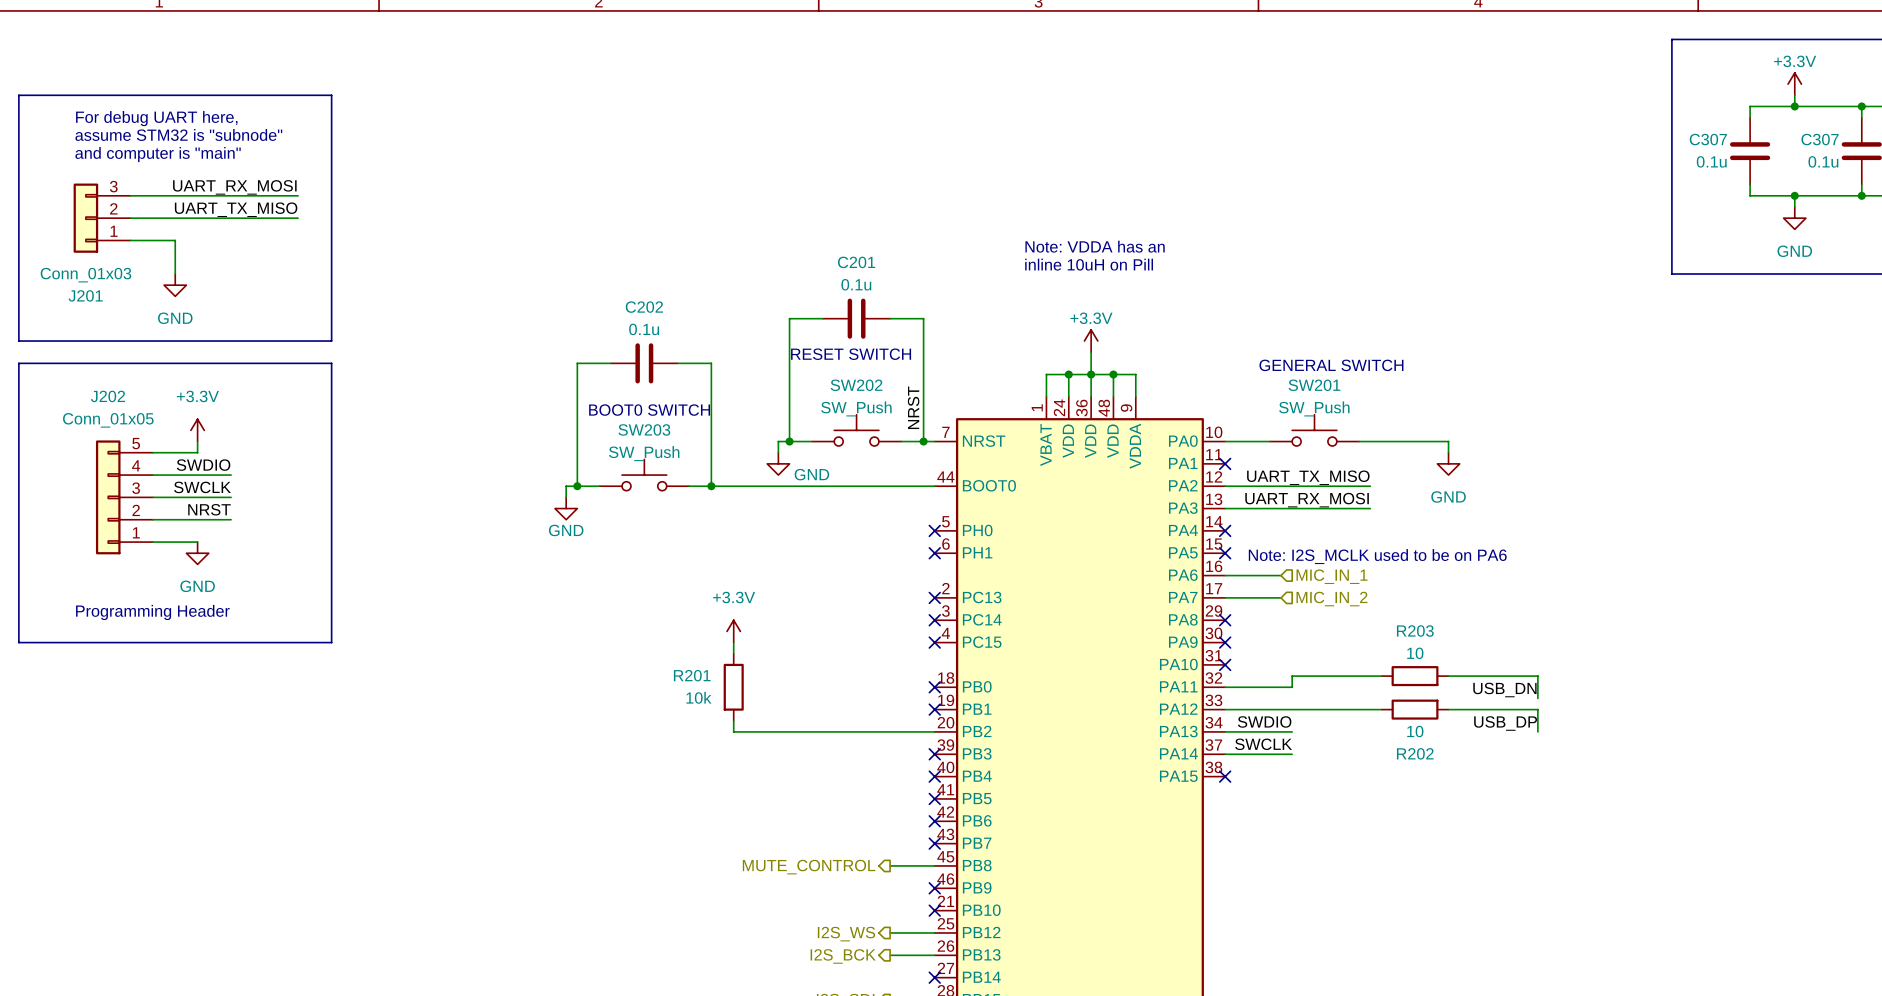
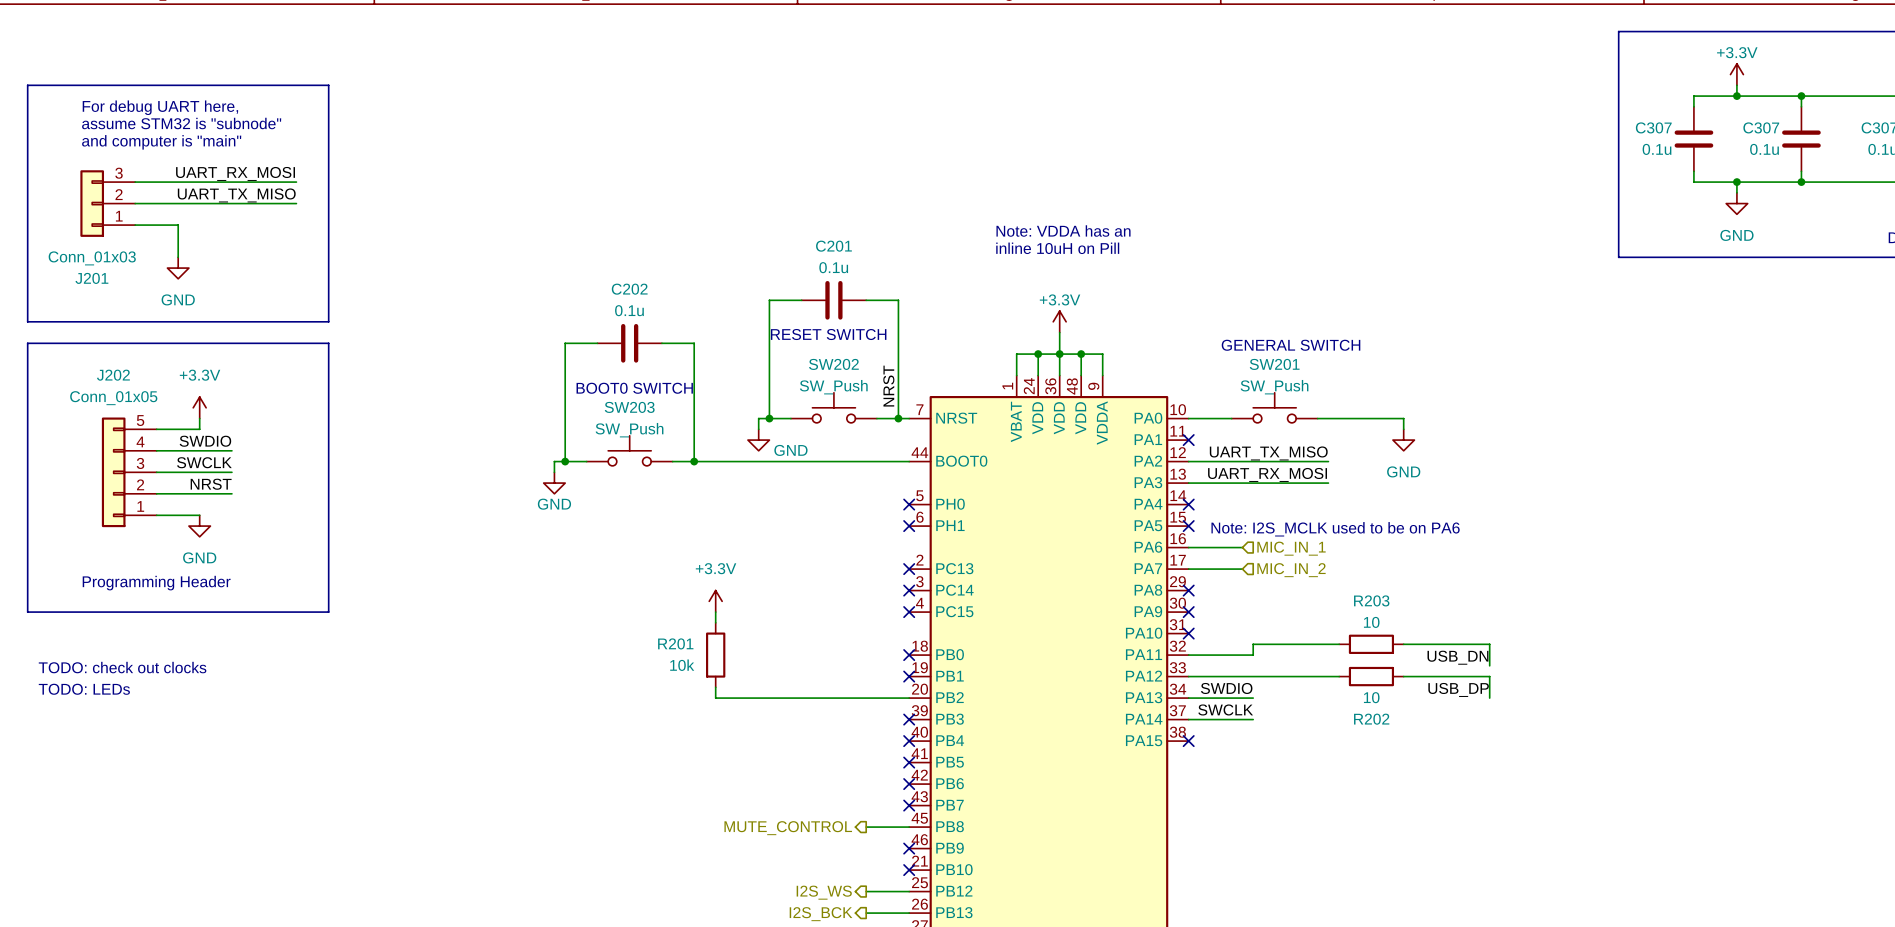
text: none -> TODO: check out clocks (122, 667)
text: none -> TODO: LEDs (84, 689)

